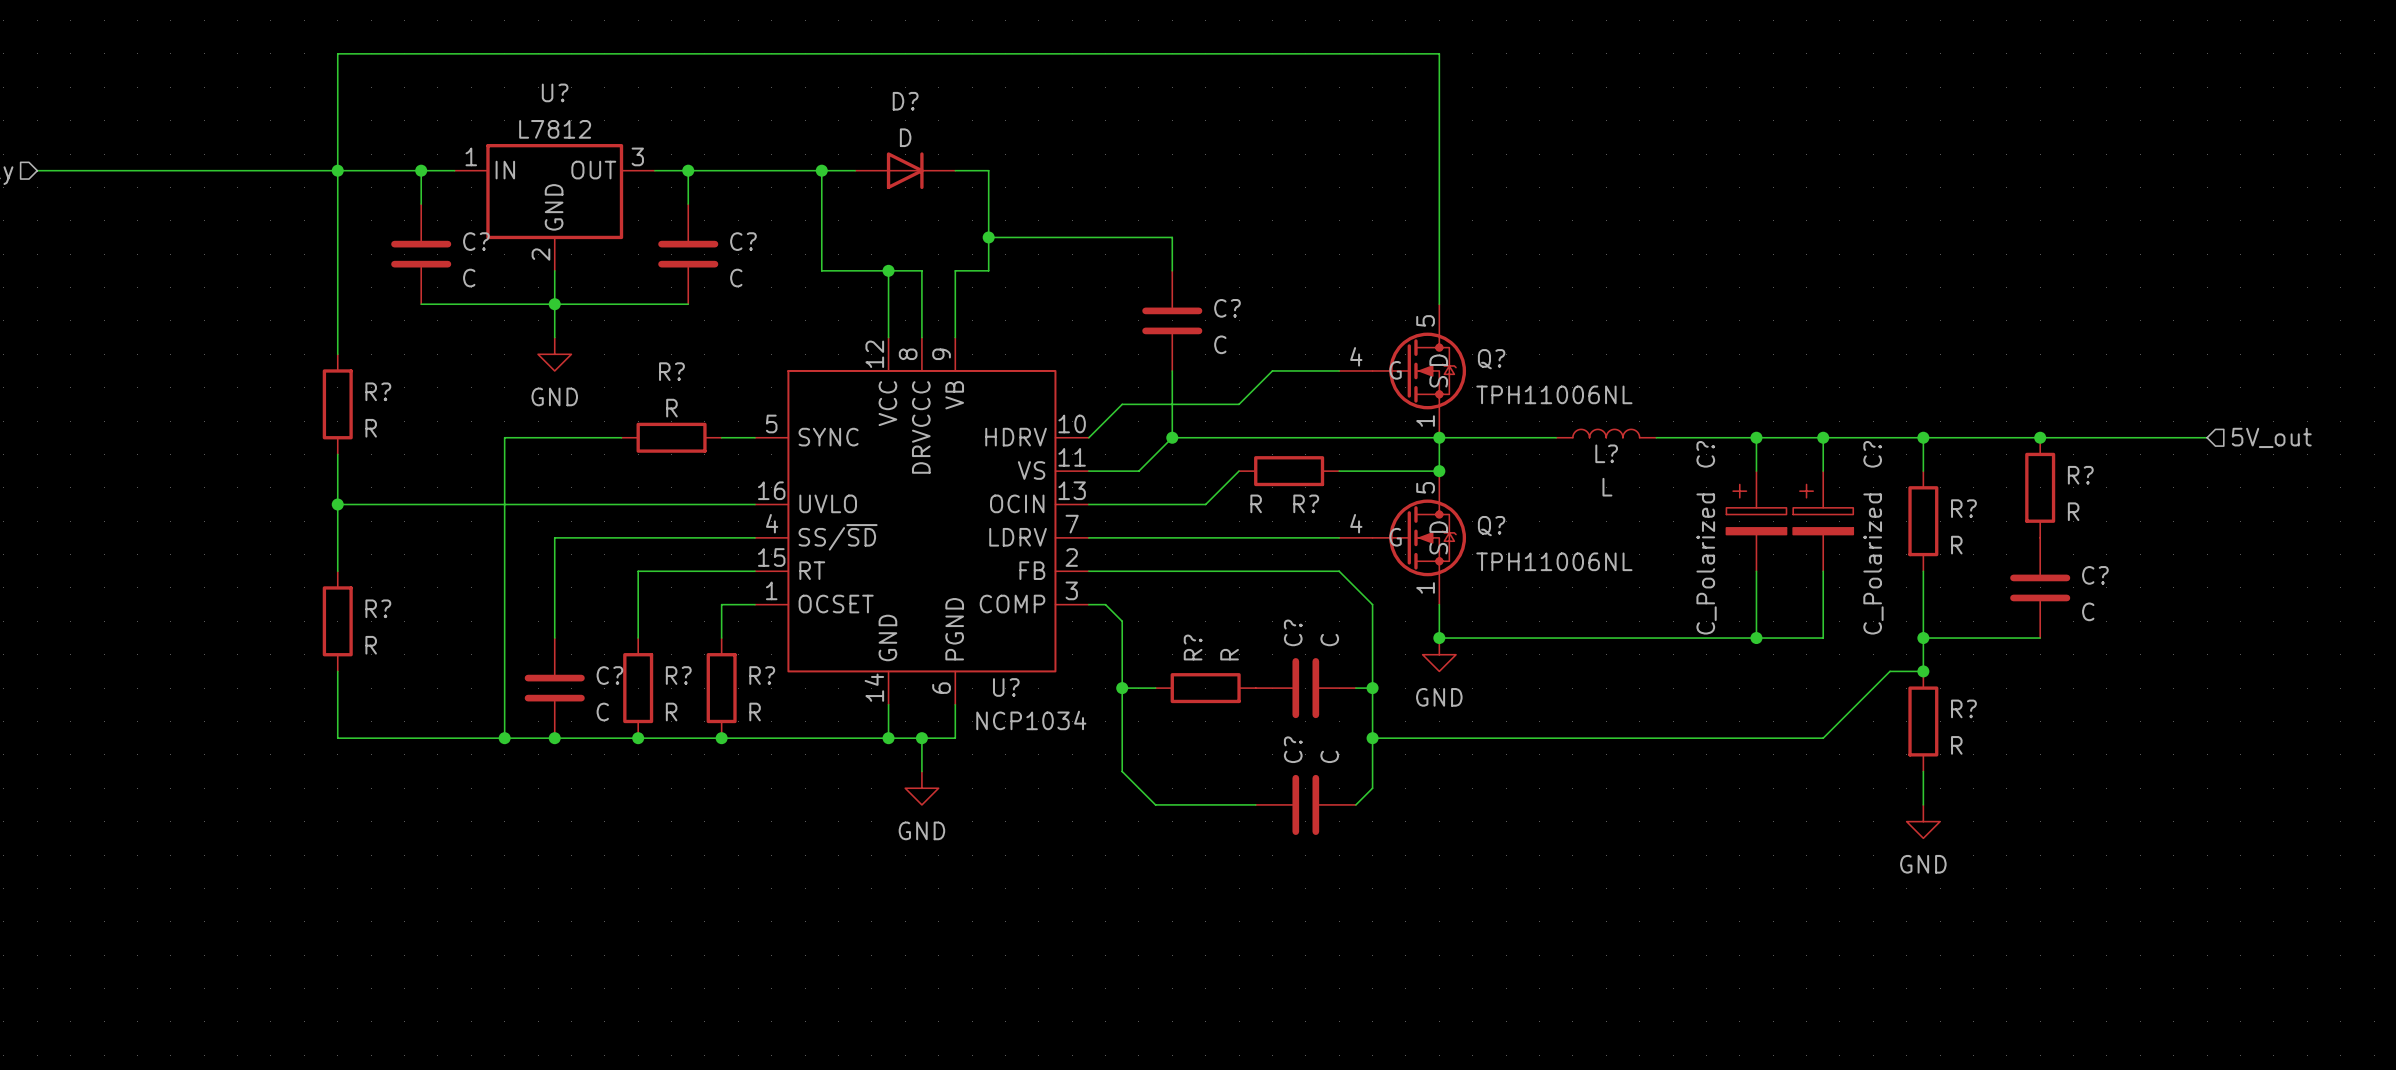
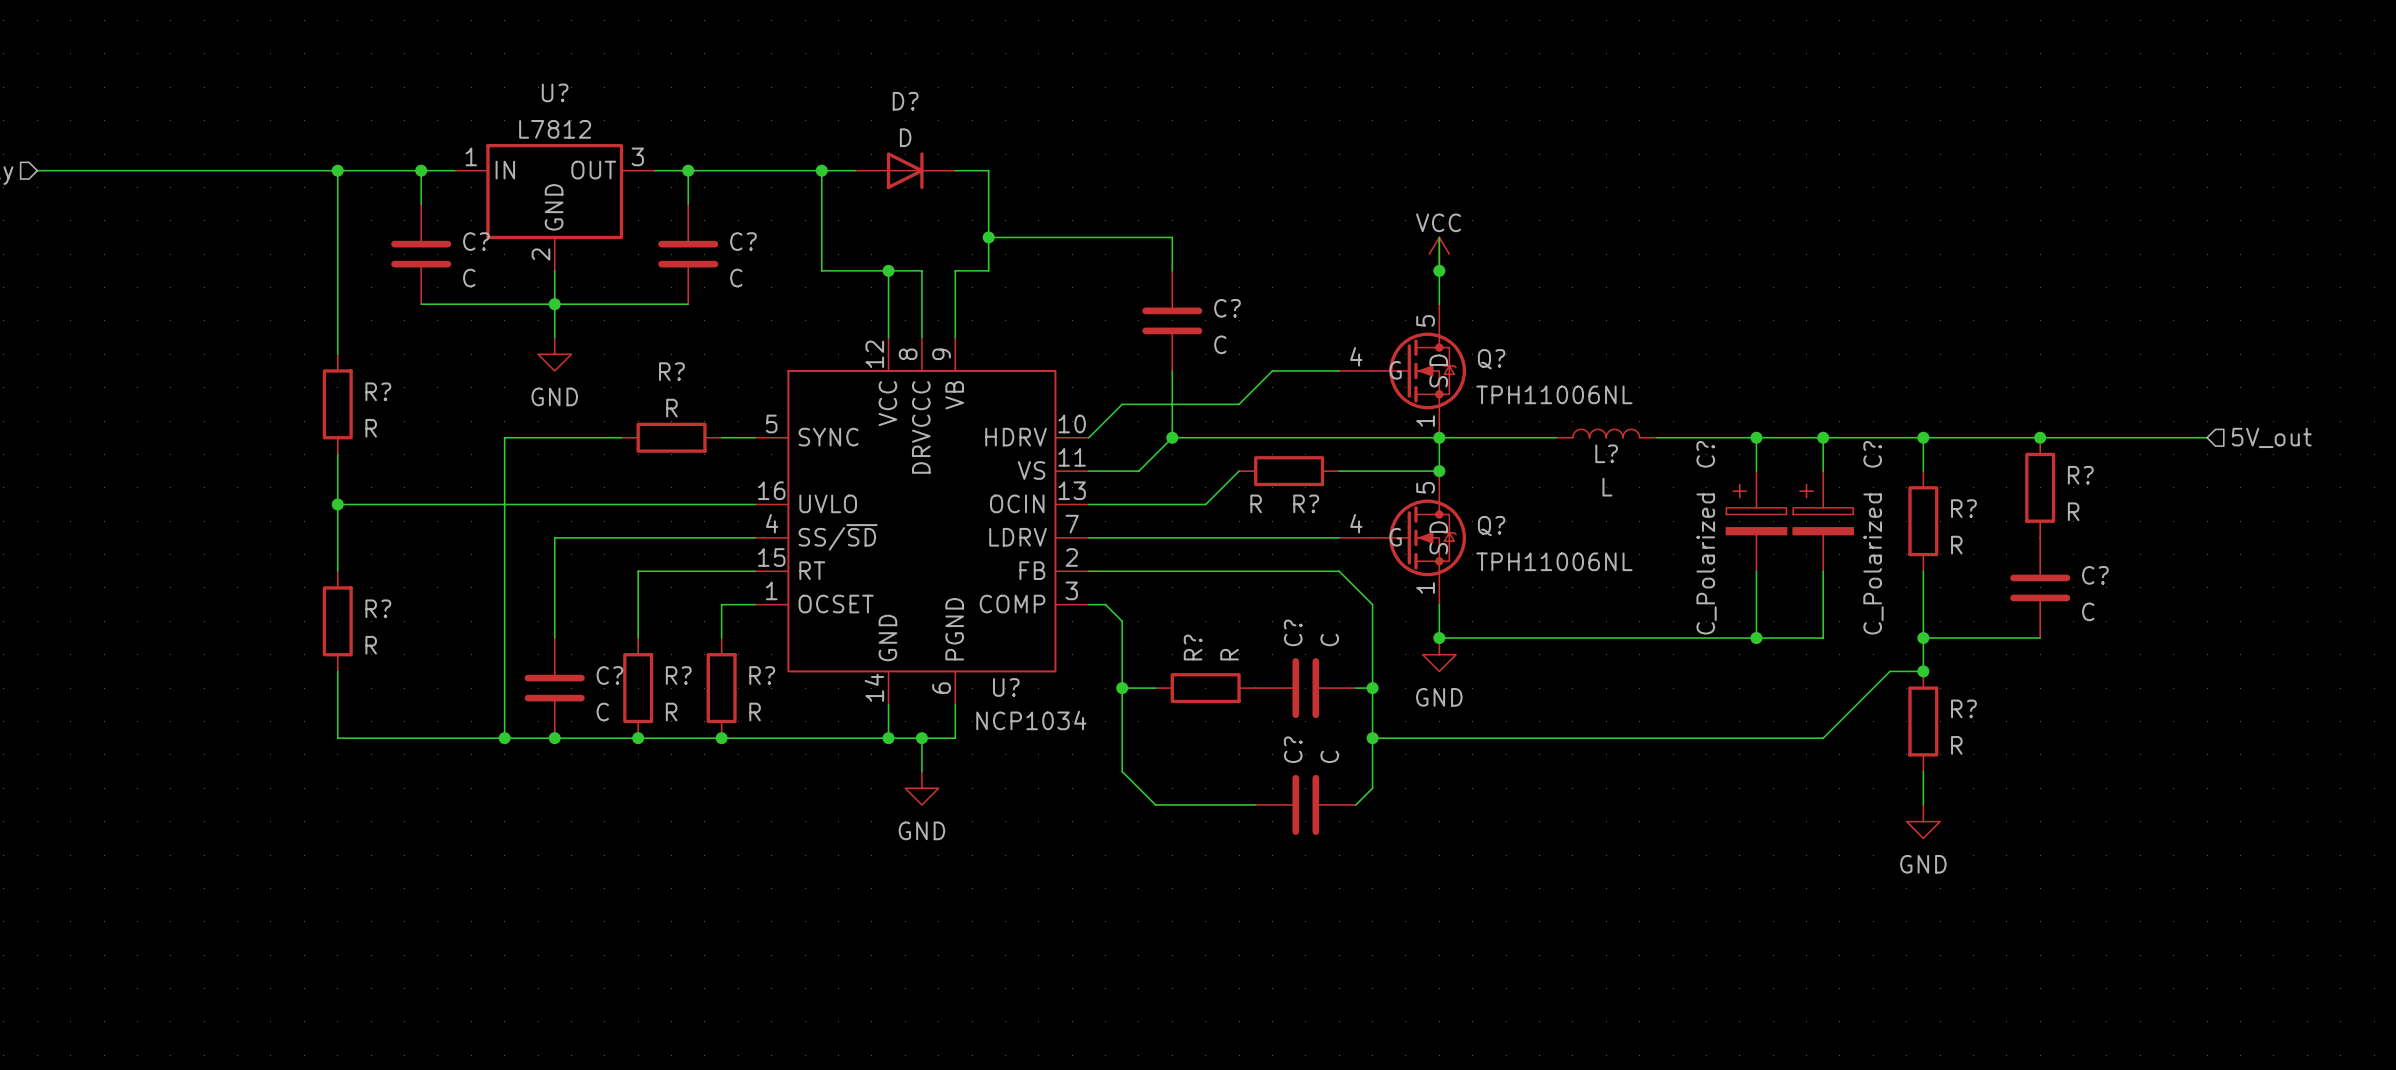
wire: (337, 170) (337, 53) (1439, 53) (1439, 237) -> none
power symbol: none -> VCC (1439, 254)
junction: none -> (1439, 270)

